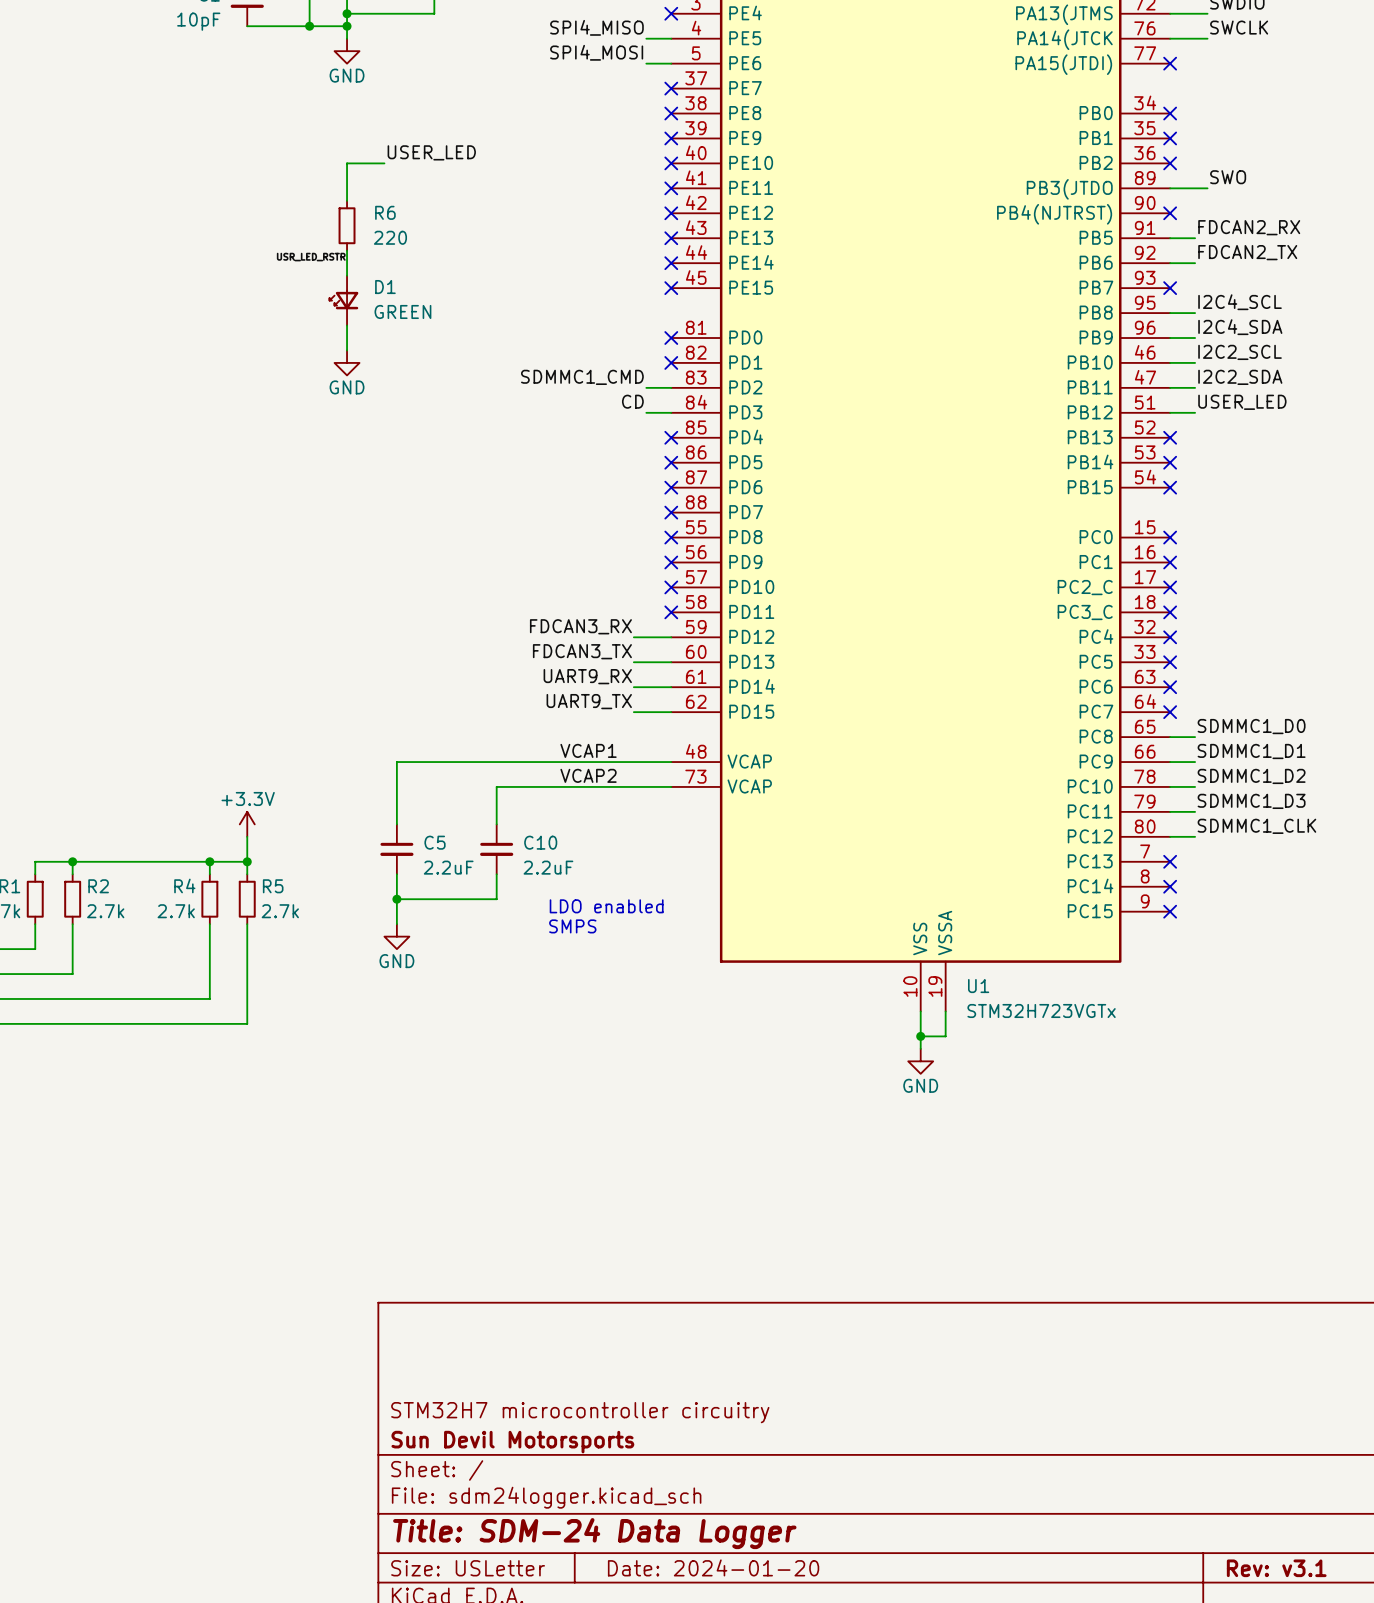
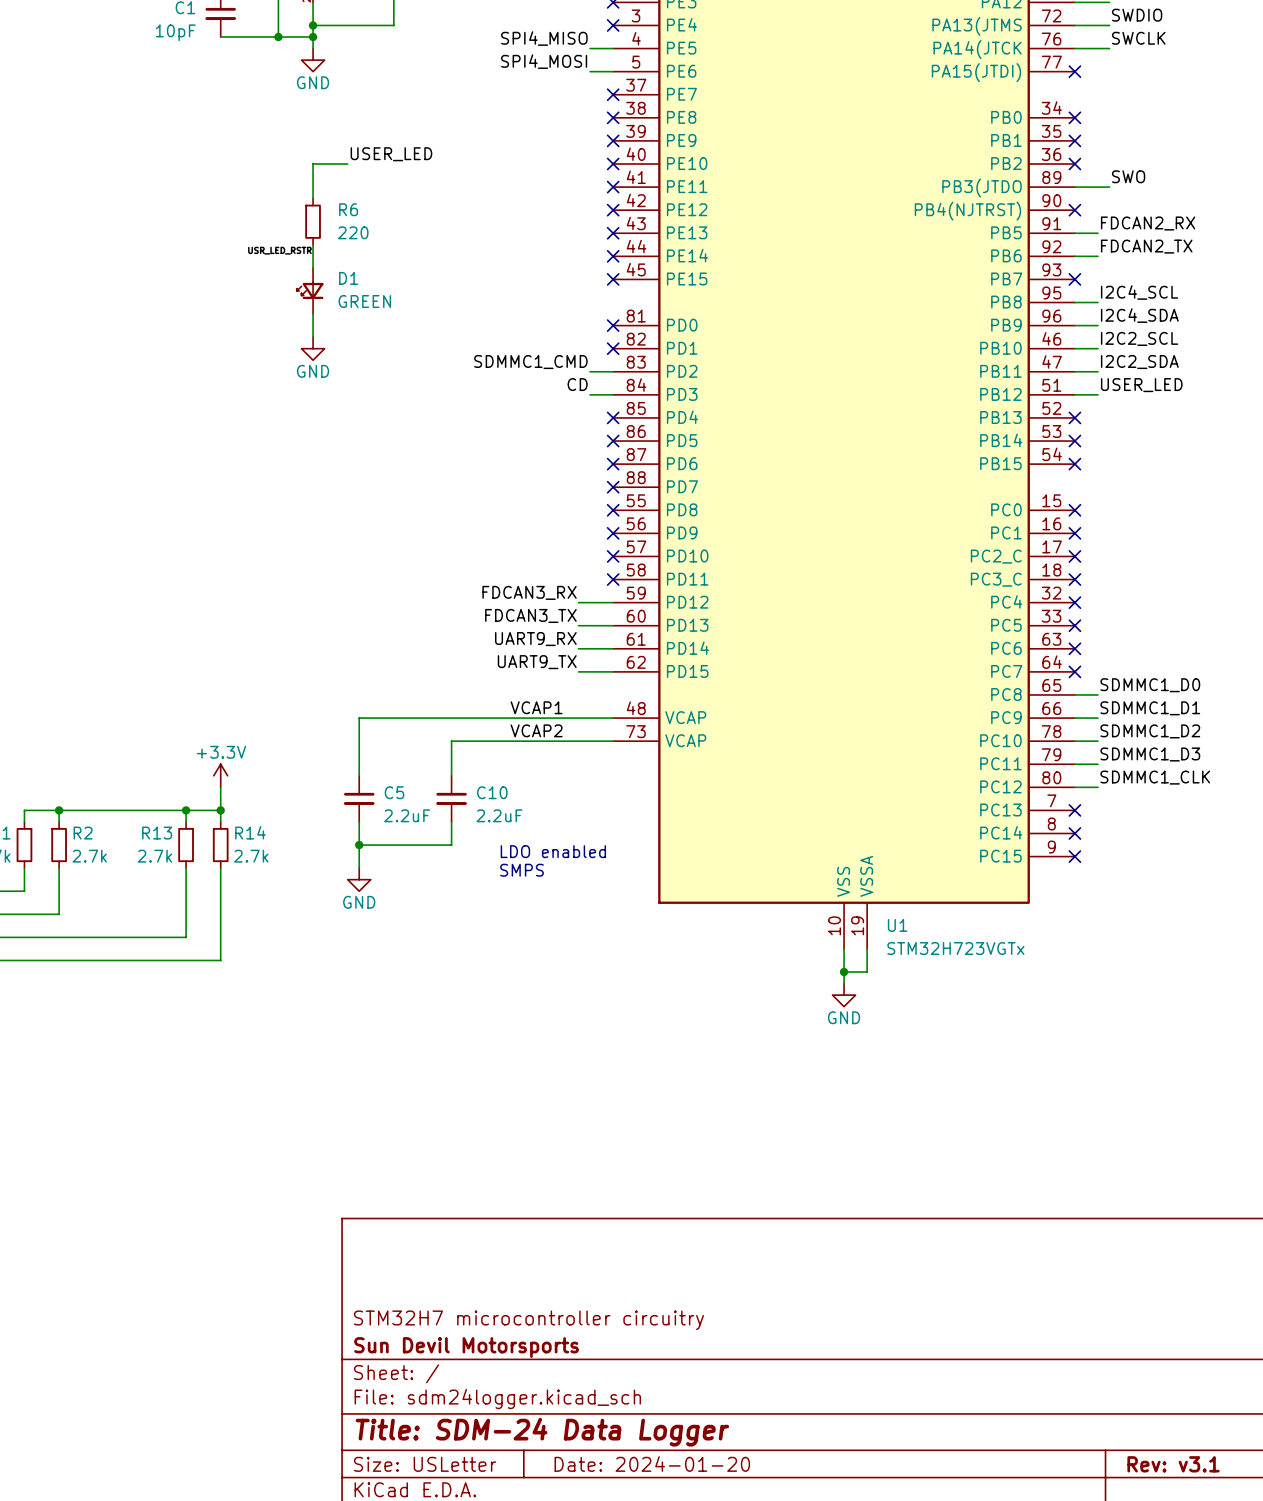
R4 name: R4 (184, 885) -> R13 (157, 833)
R5 name: R5 (273, 886) -> R14 (250, 832)

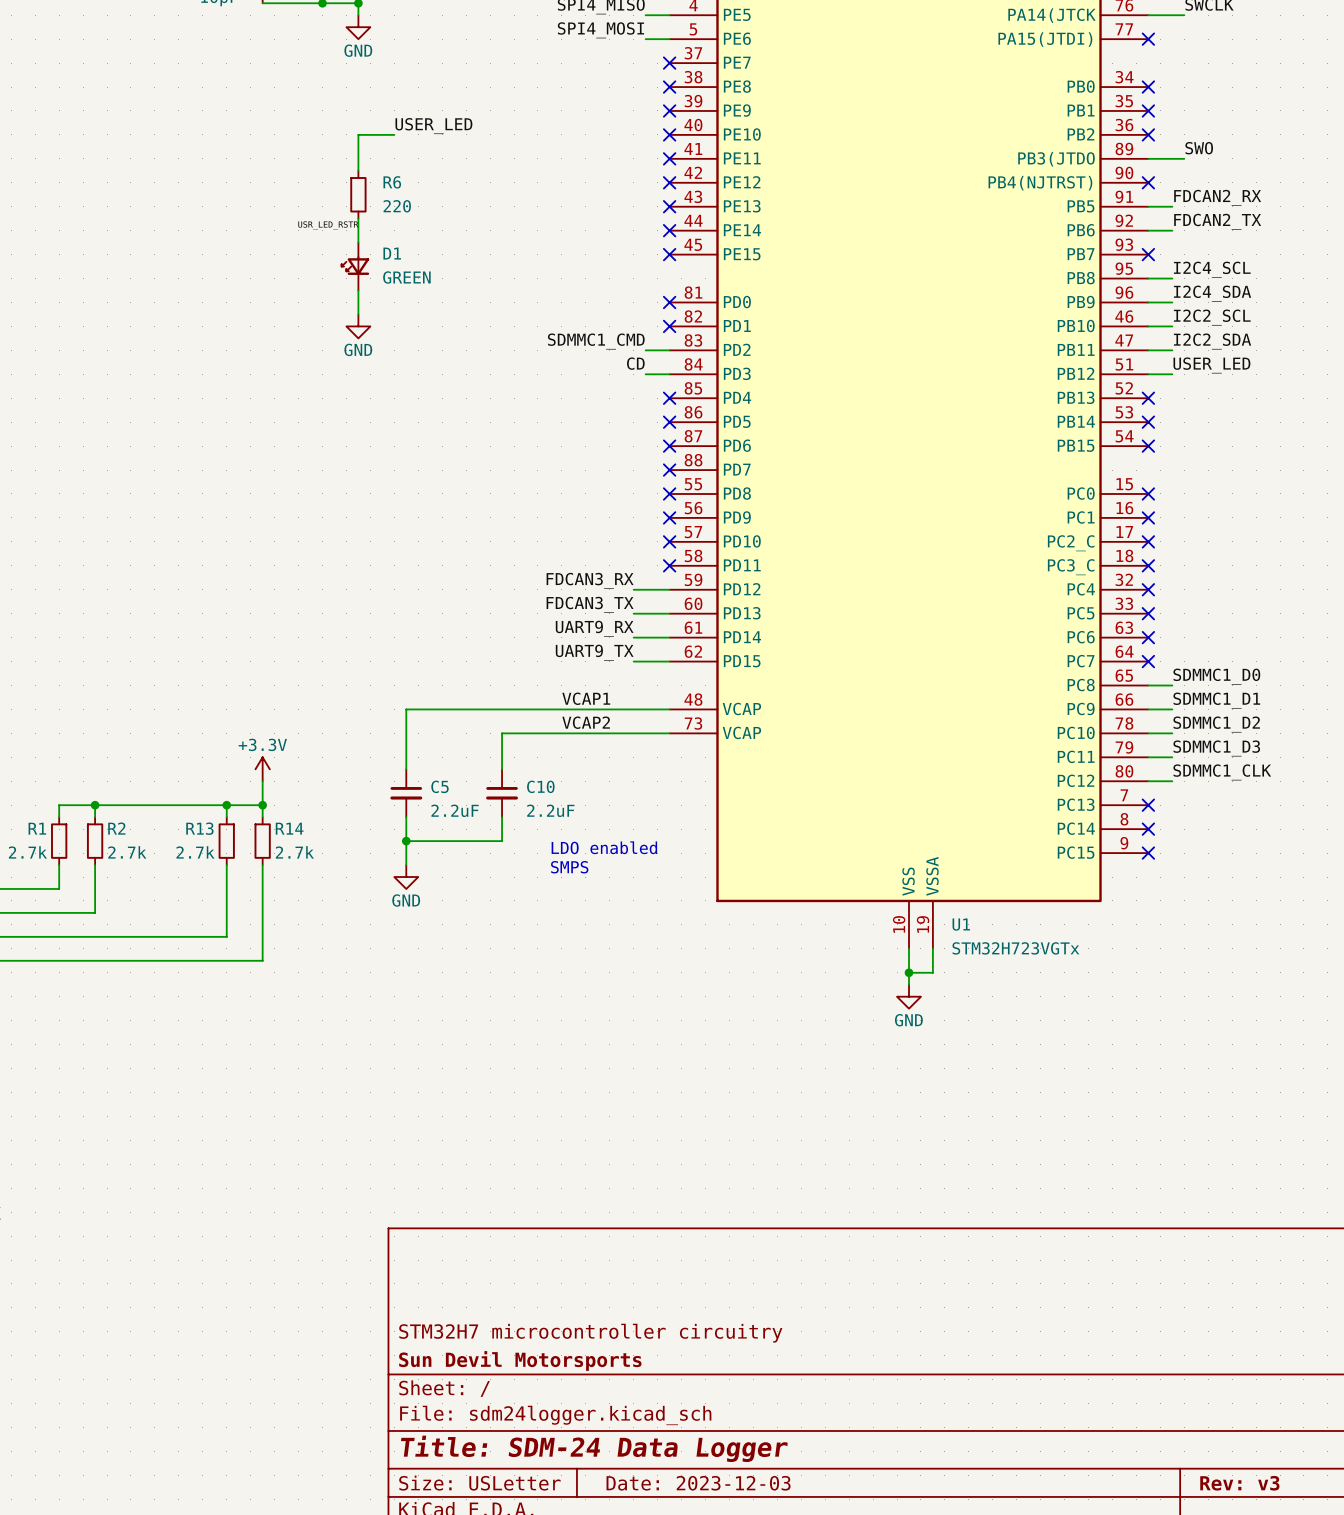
title block: Date: 2024-01-20 (652, 1464) -> Date: 2023-12-03 (698, 1483)
title block: Rev: v3.1 (1173, 1464) -> Rev: v3 (1239, 1483)

